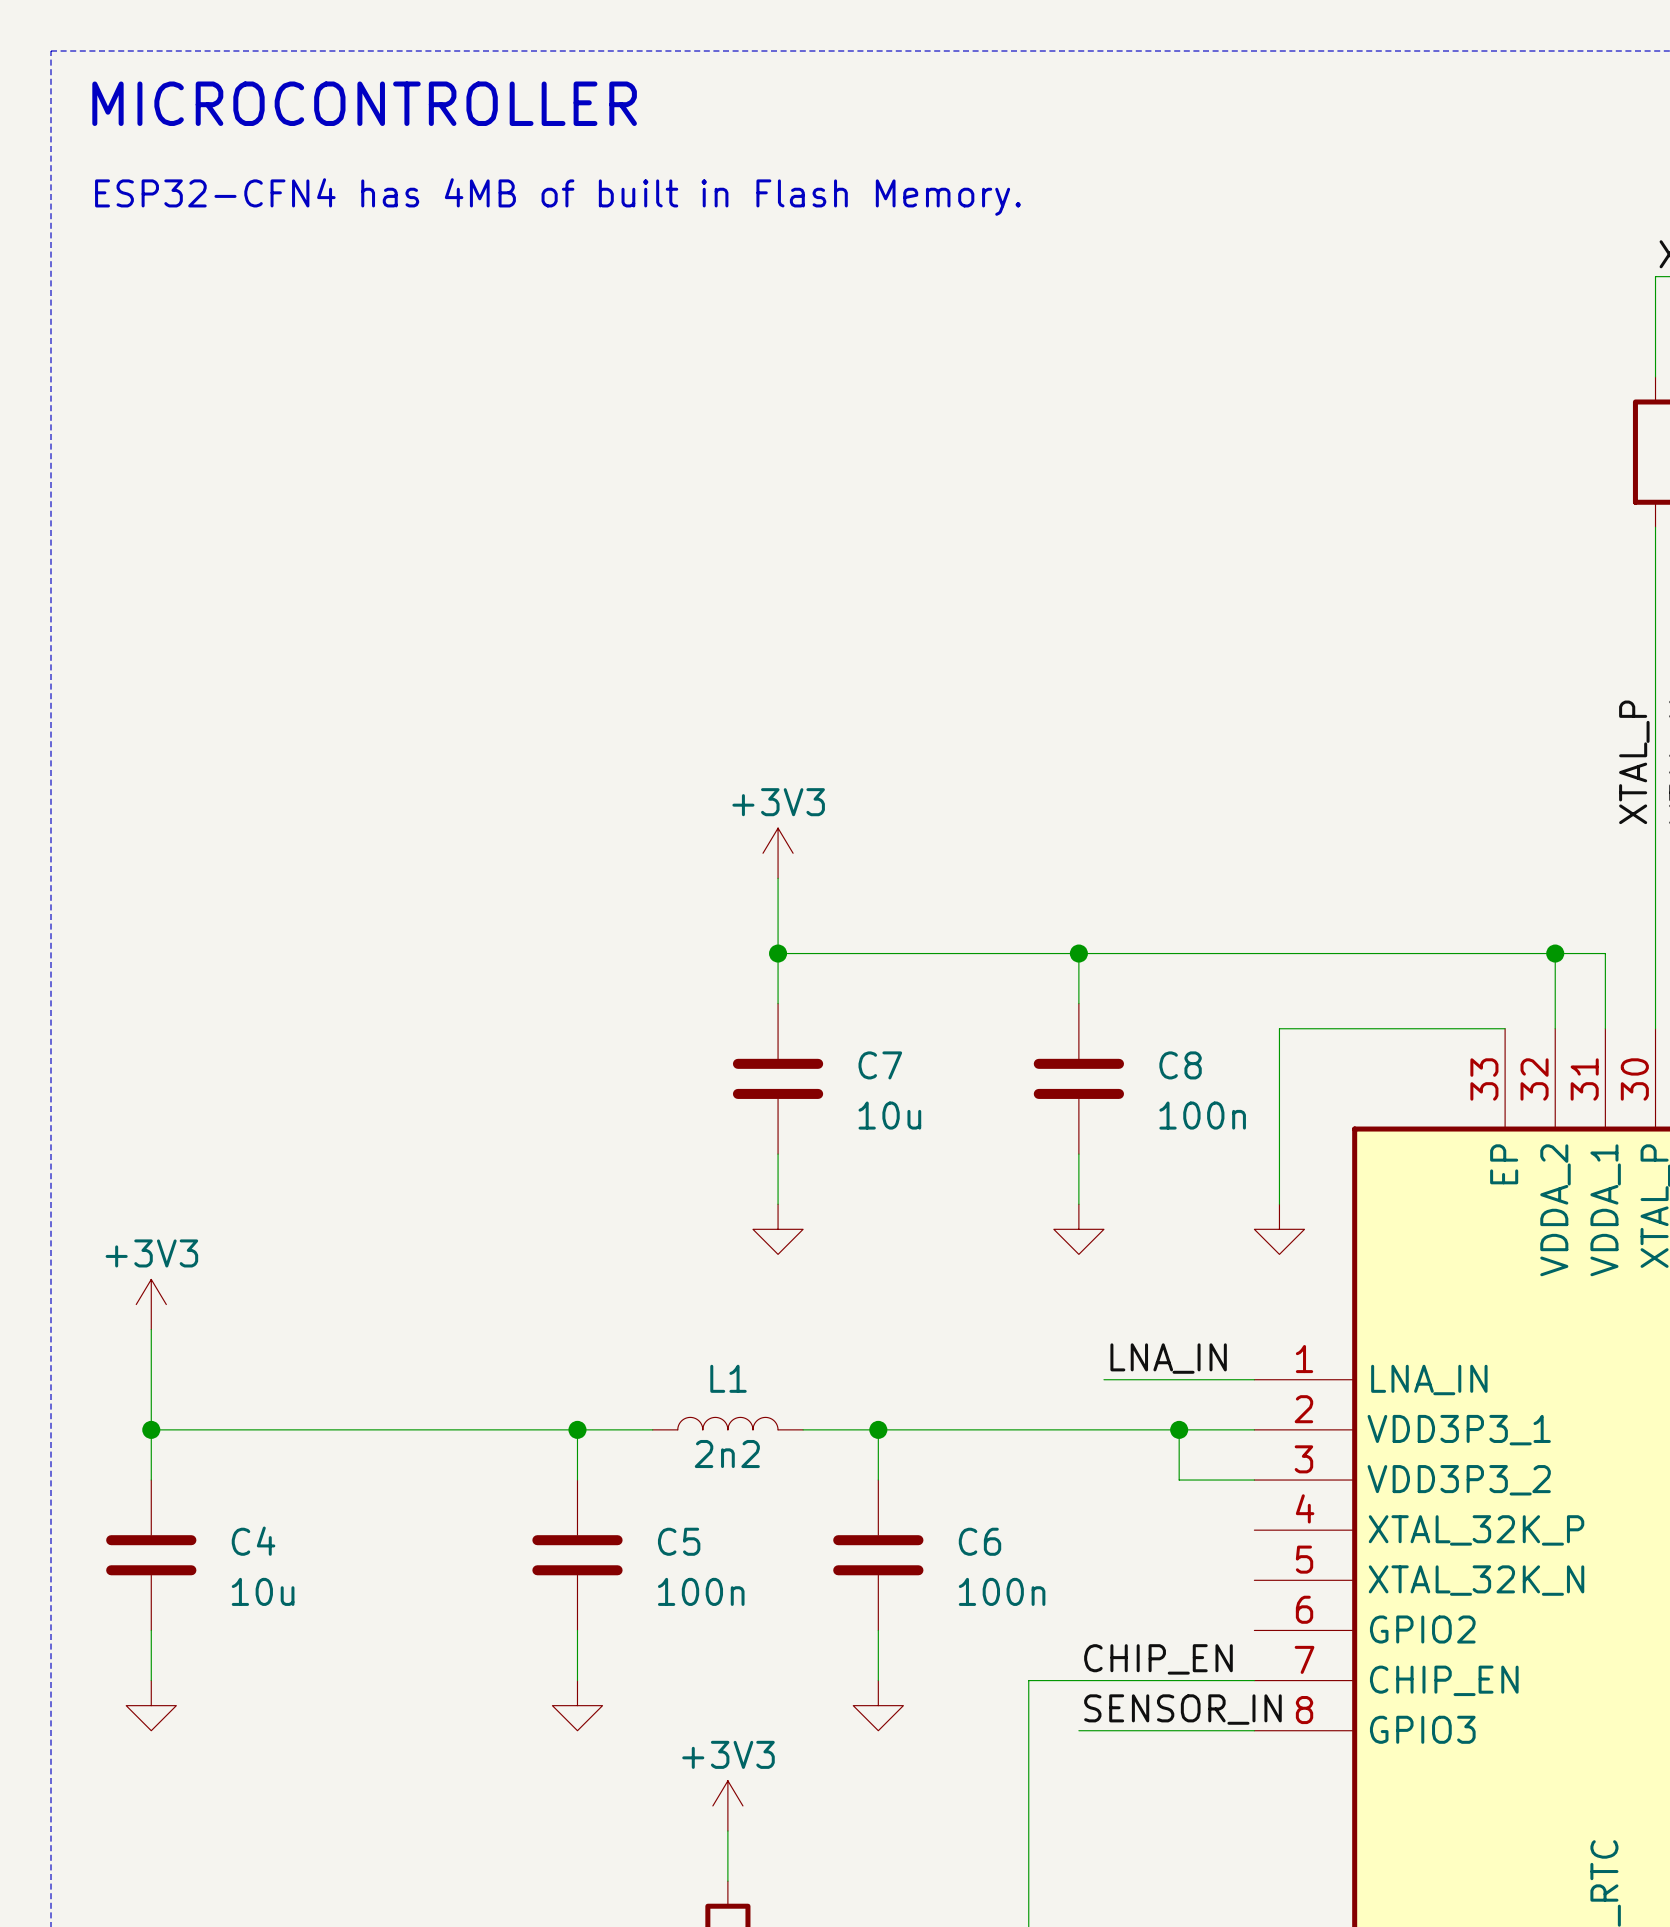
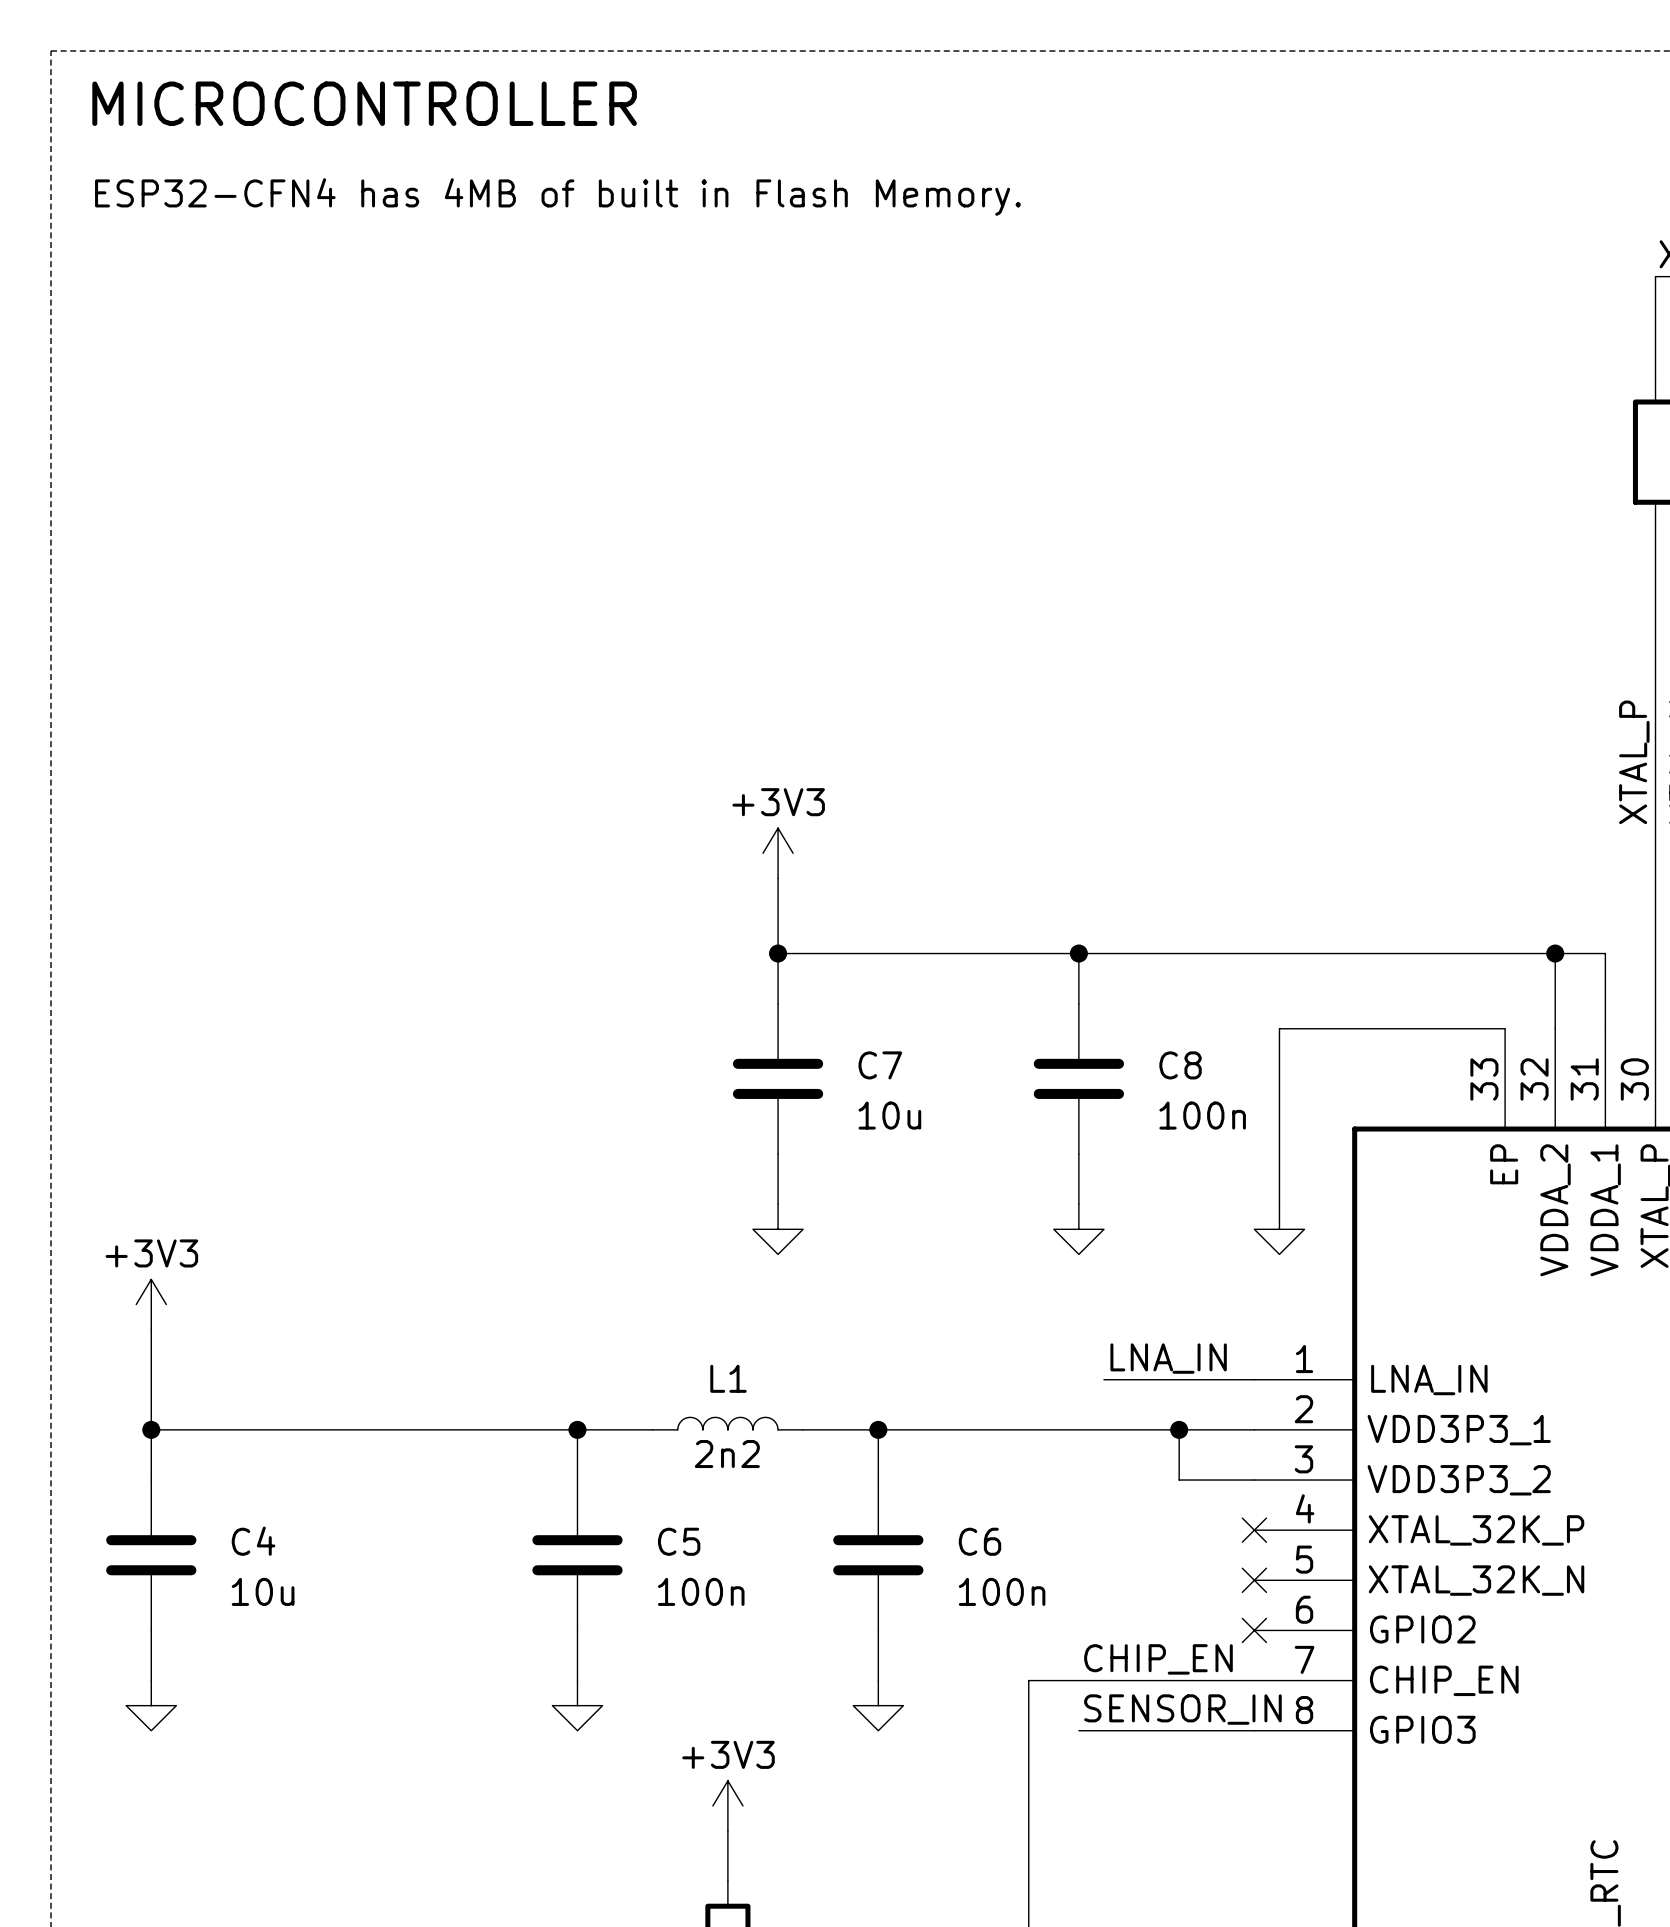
no-connect mark: none -> (1254, 1530)
no-connect mark: none -> (1254, 1580)
no-connect mark: none -> (1254, 1630)

